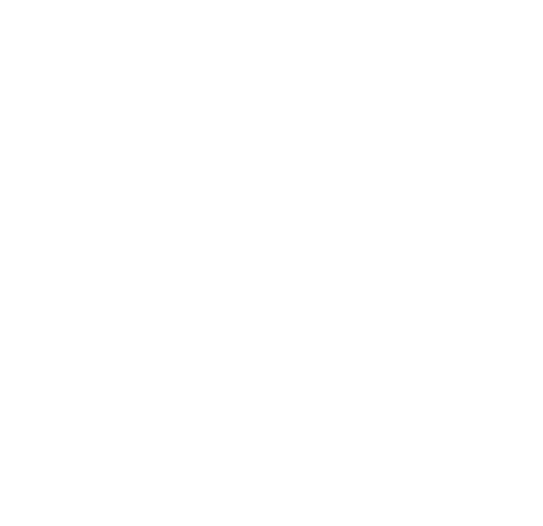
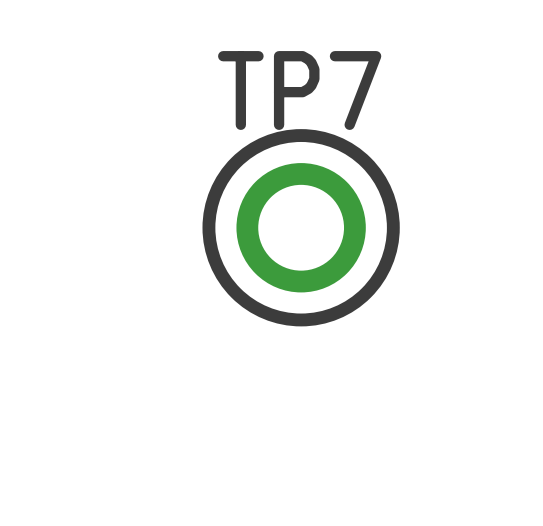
TP7: none -> (301, 227)

